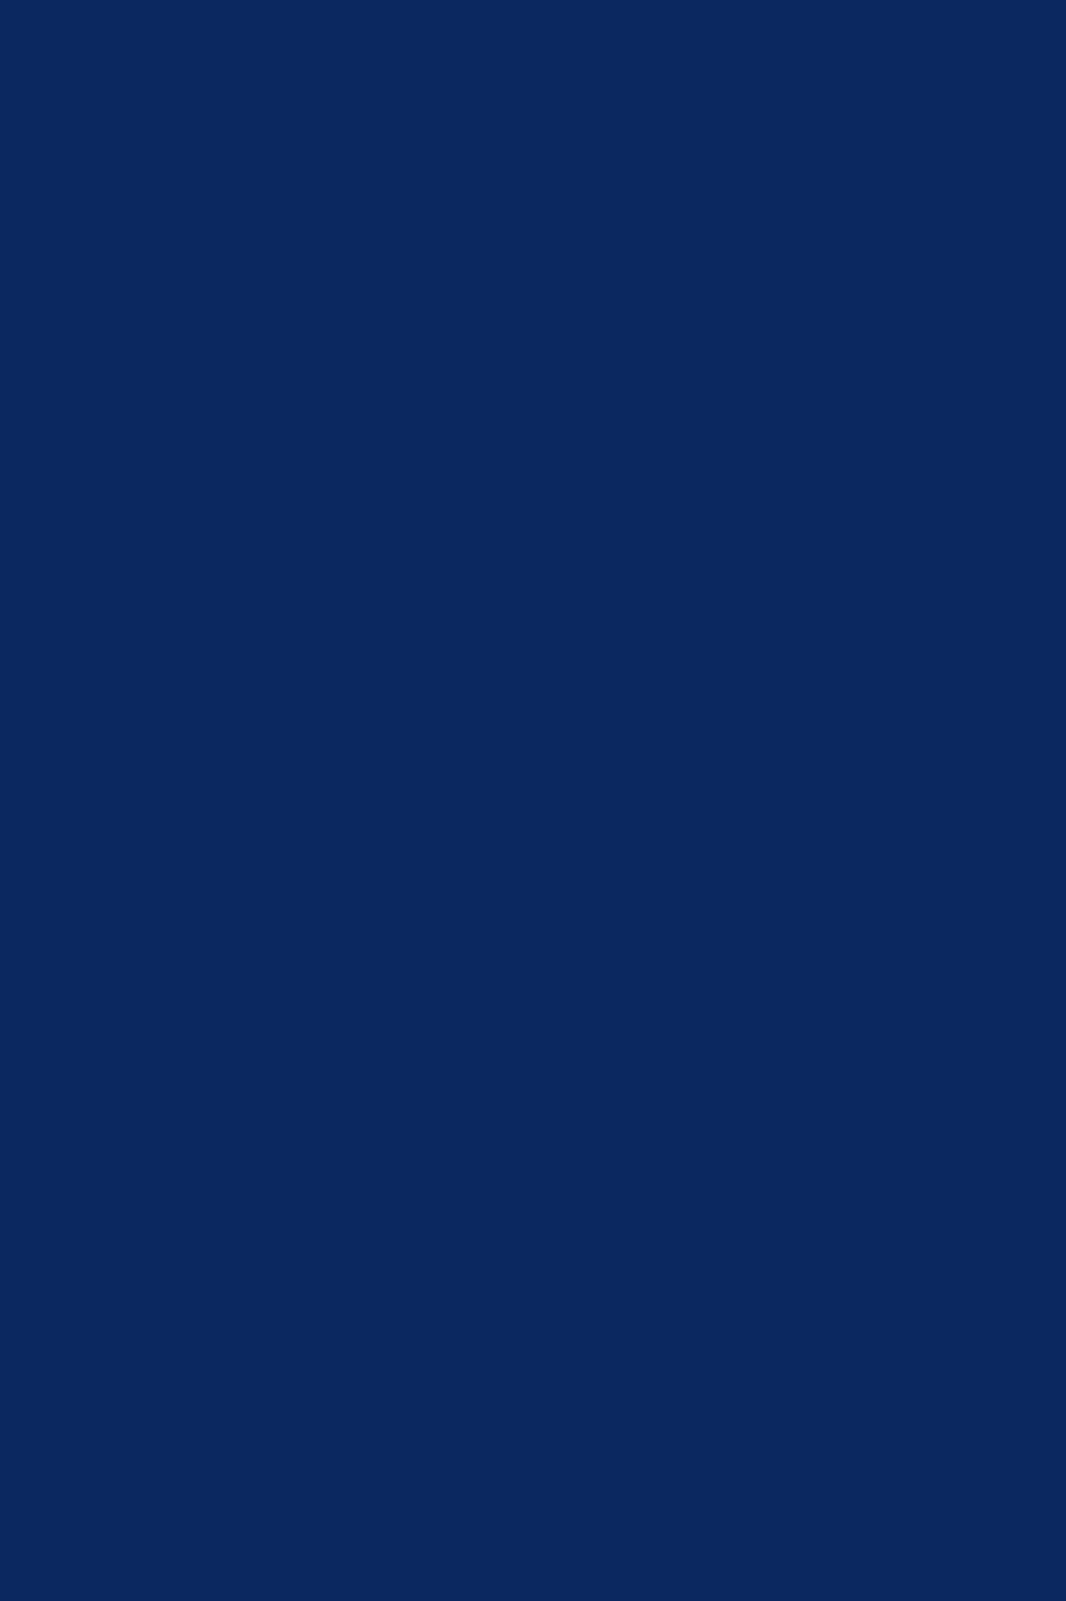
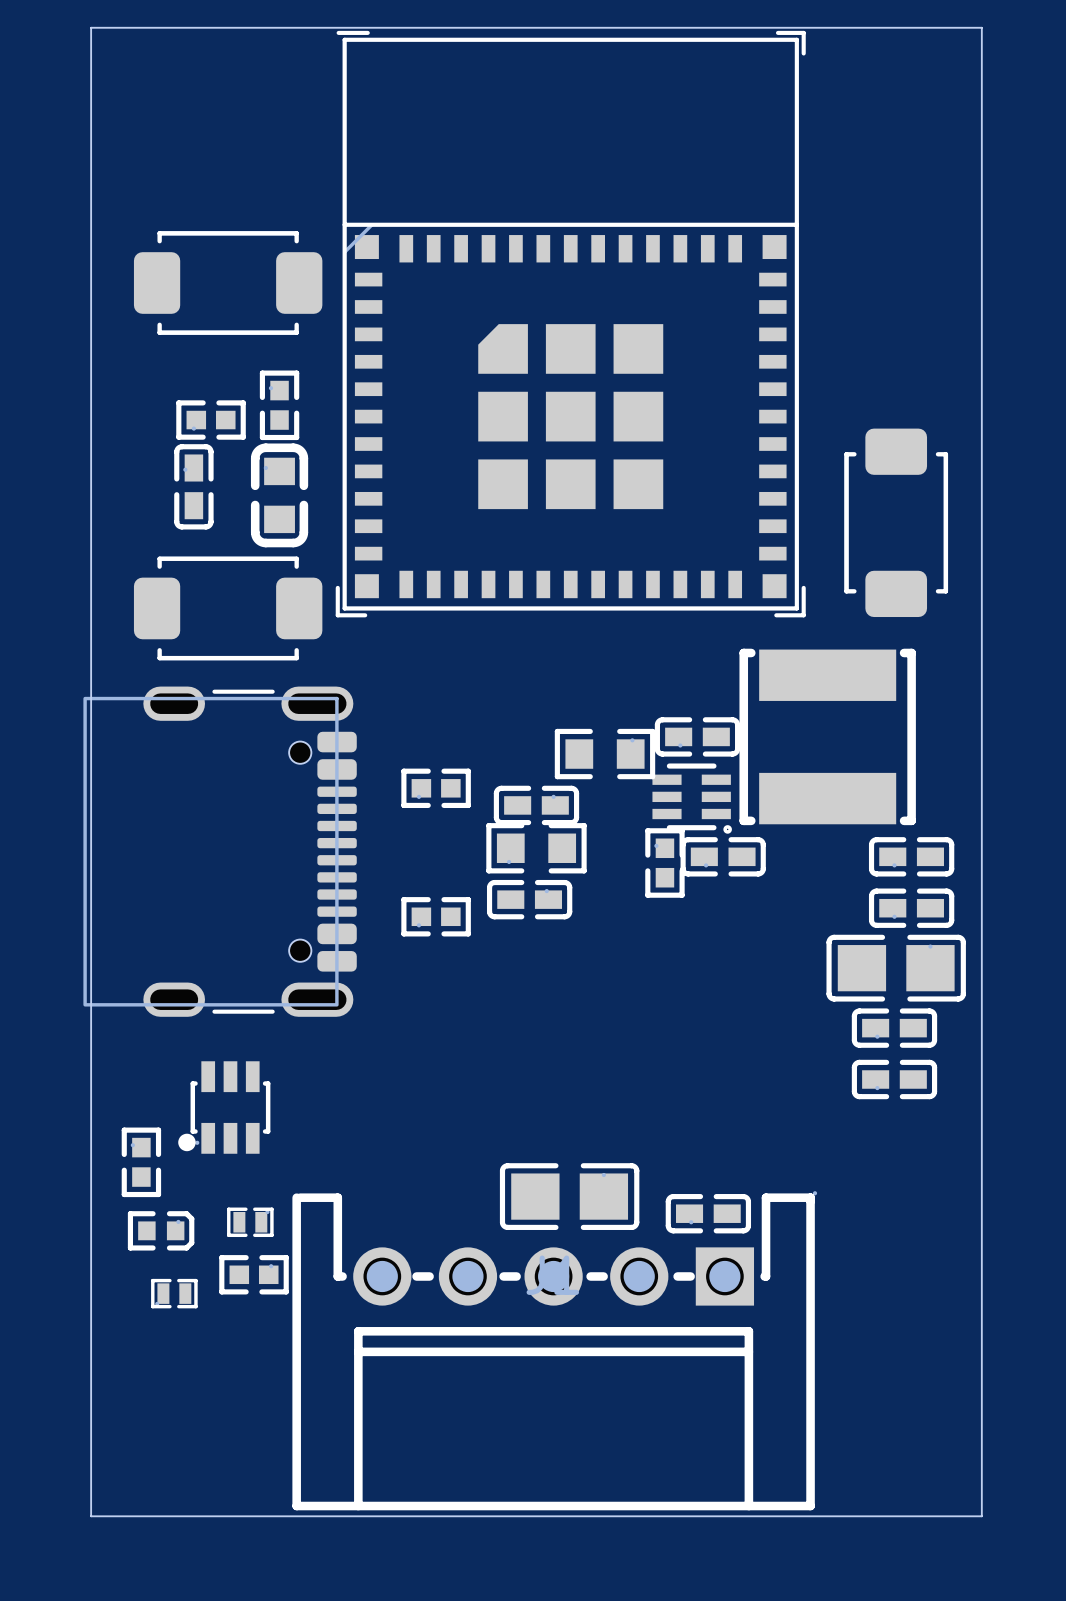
board edge: none -> (91, 27) (91, 1516) (981, 1516) (981, 27) (91, 27)
part: none -> (228, 283)
part: none -> (570, 324)
part: none -> (279, 405)
part: none -> (211, 420)
part: none -> (193, 486)
part: none -> (279, 495)
part: none -> (896, 522)
part: none -> (228, 608)
part: none -> (697, 736)
part: none -> (827, 736)
part: none -> (605, 754)
part: none -> (436, 788)
part: none -> (692, 798)
part: none -> (536, 805)
part: none -> (536, 848)
part: none -> (220, 851)
part: none -> (723, 856)
part: none -> (911, 856)
part: none -> (664, 862)
part: none -> (529, 899)
part: none -> (911, 908)
part: none -> (436, 916)
part: none -> (896, 968)
part: none -> (894, 1028)
part: none -> (894, 1079)
part: none -> (224, 1107)
part: none -> (141, 1162)
part: none -> (569, 1196)
part: none -> (708, 1213)
part: none -> (250, 1222)
part: none -> (161, 1230)
part: none -> (254, 1274)
part: none -> (174, 1293)
part: none -> (554, 1350)

